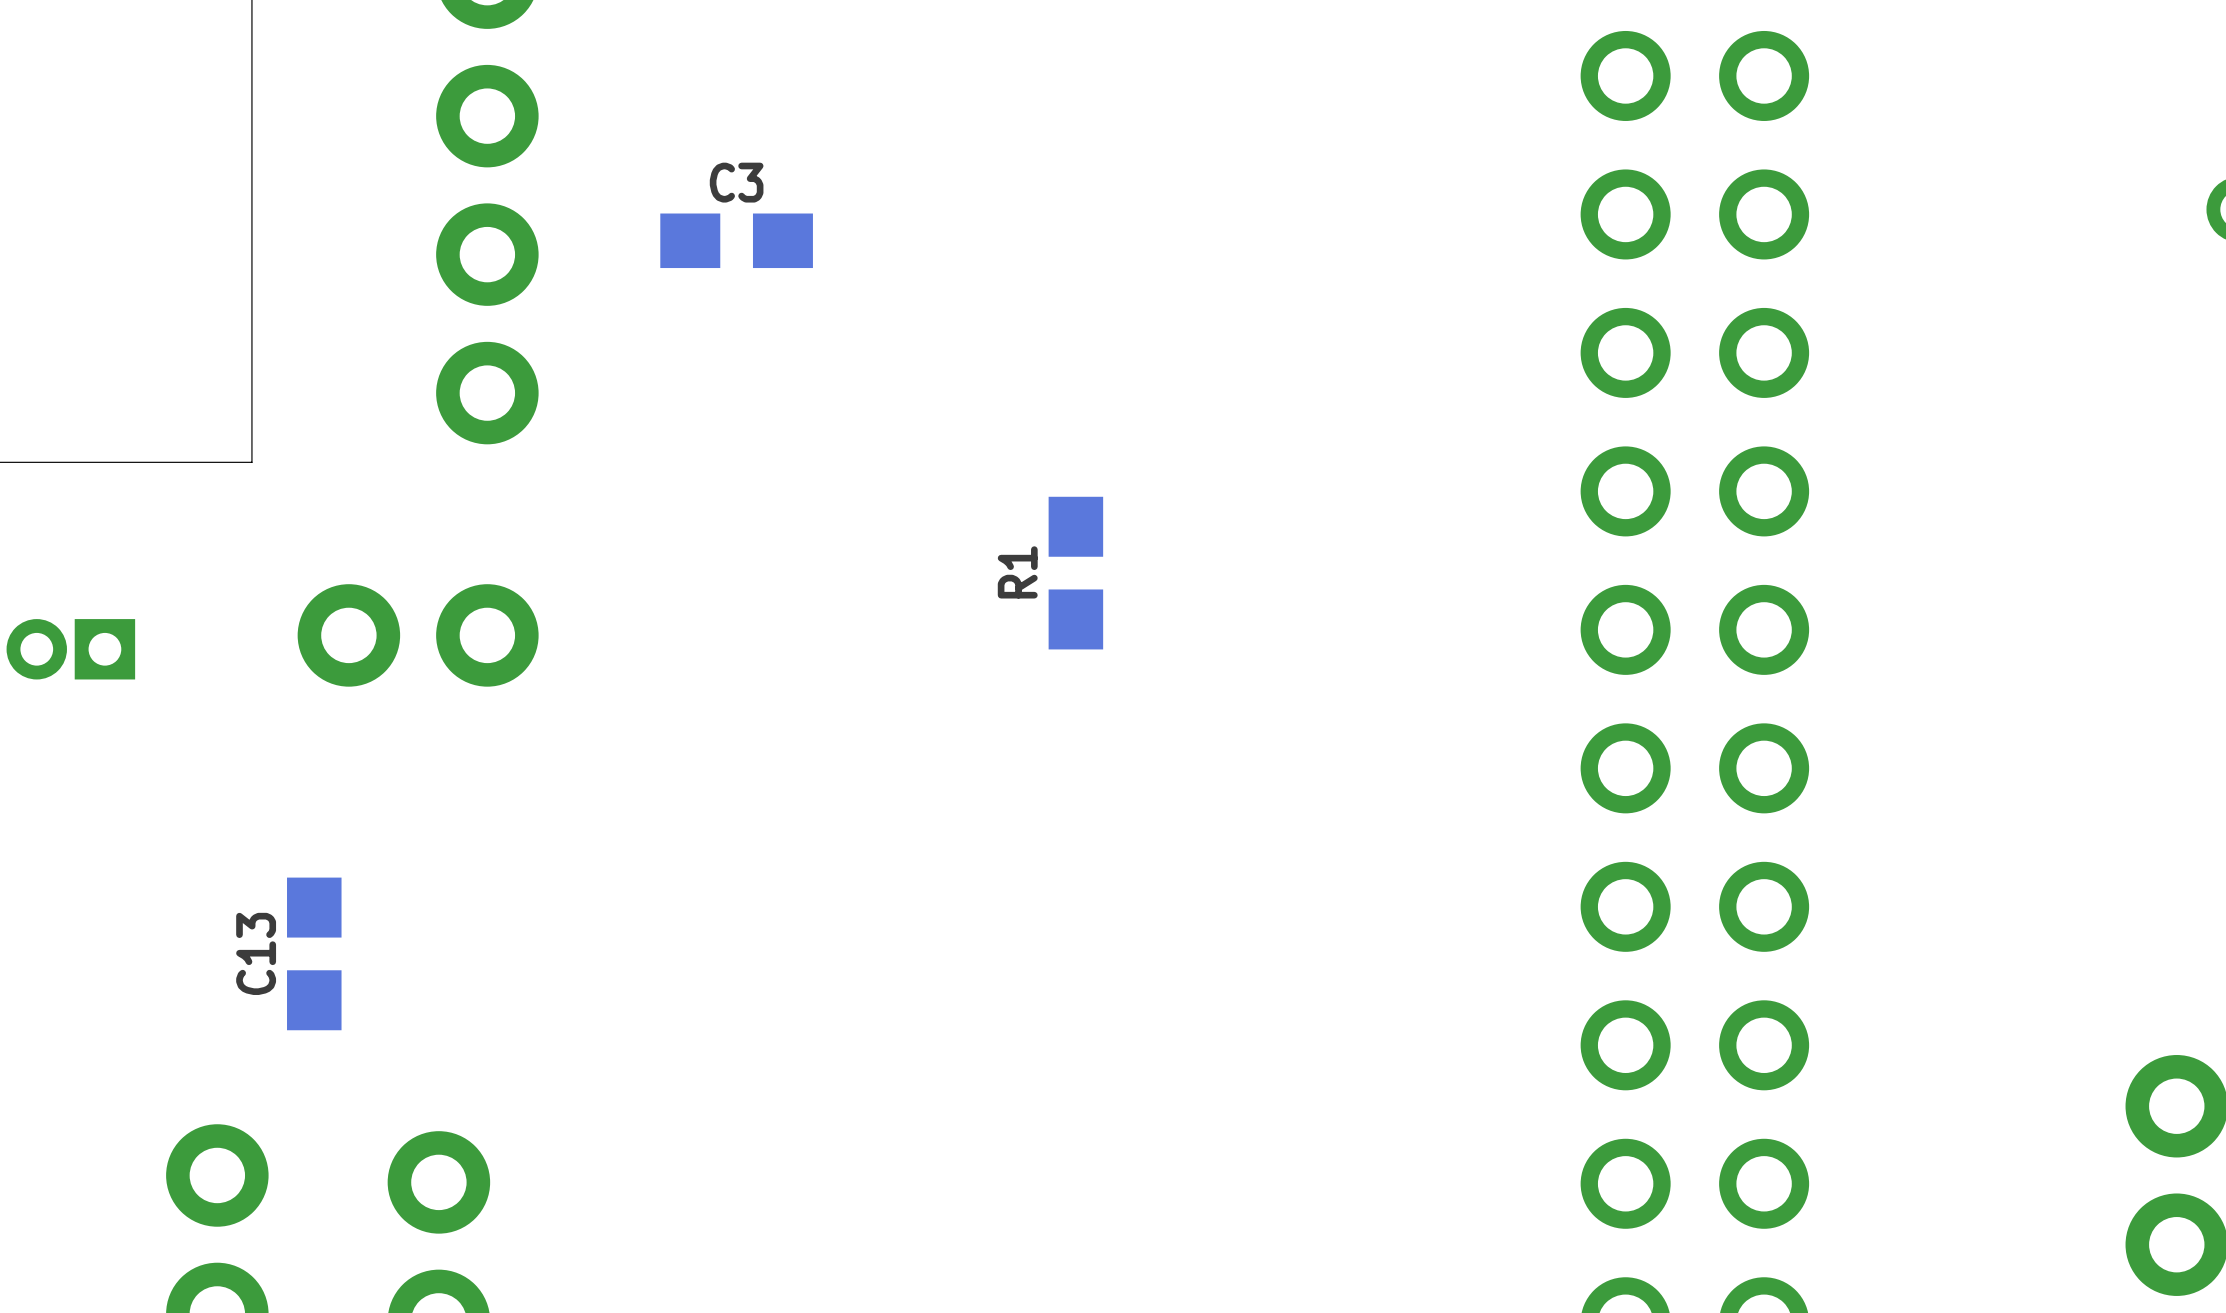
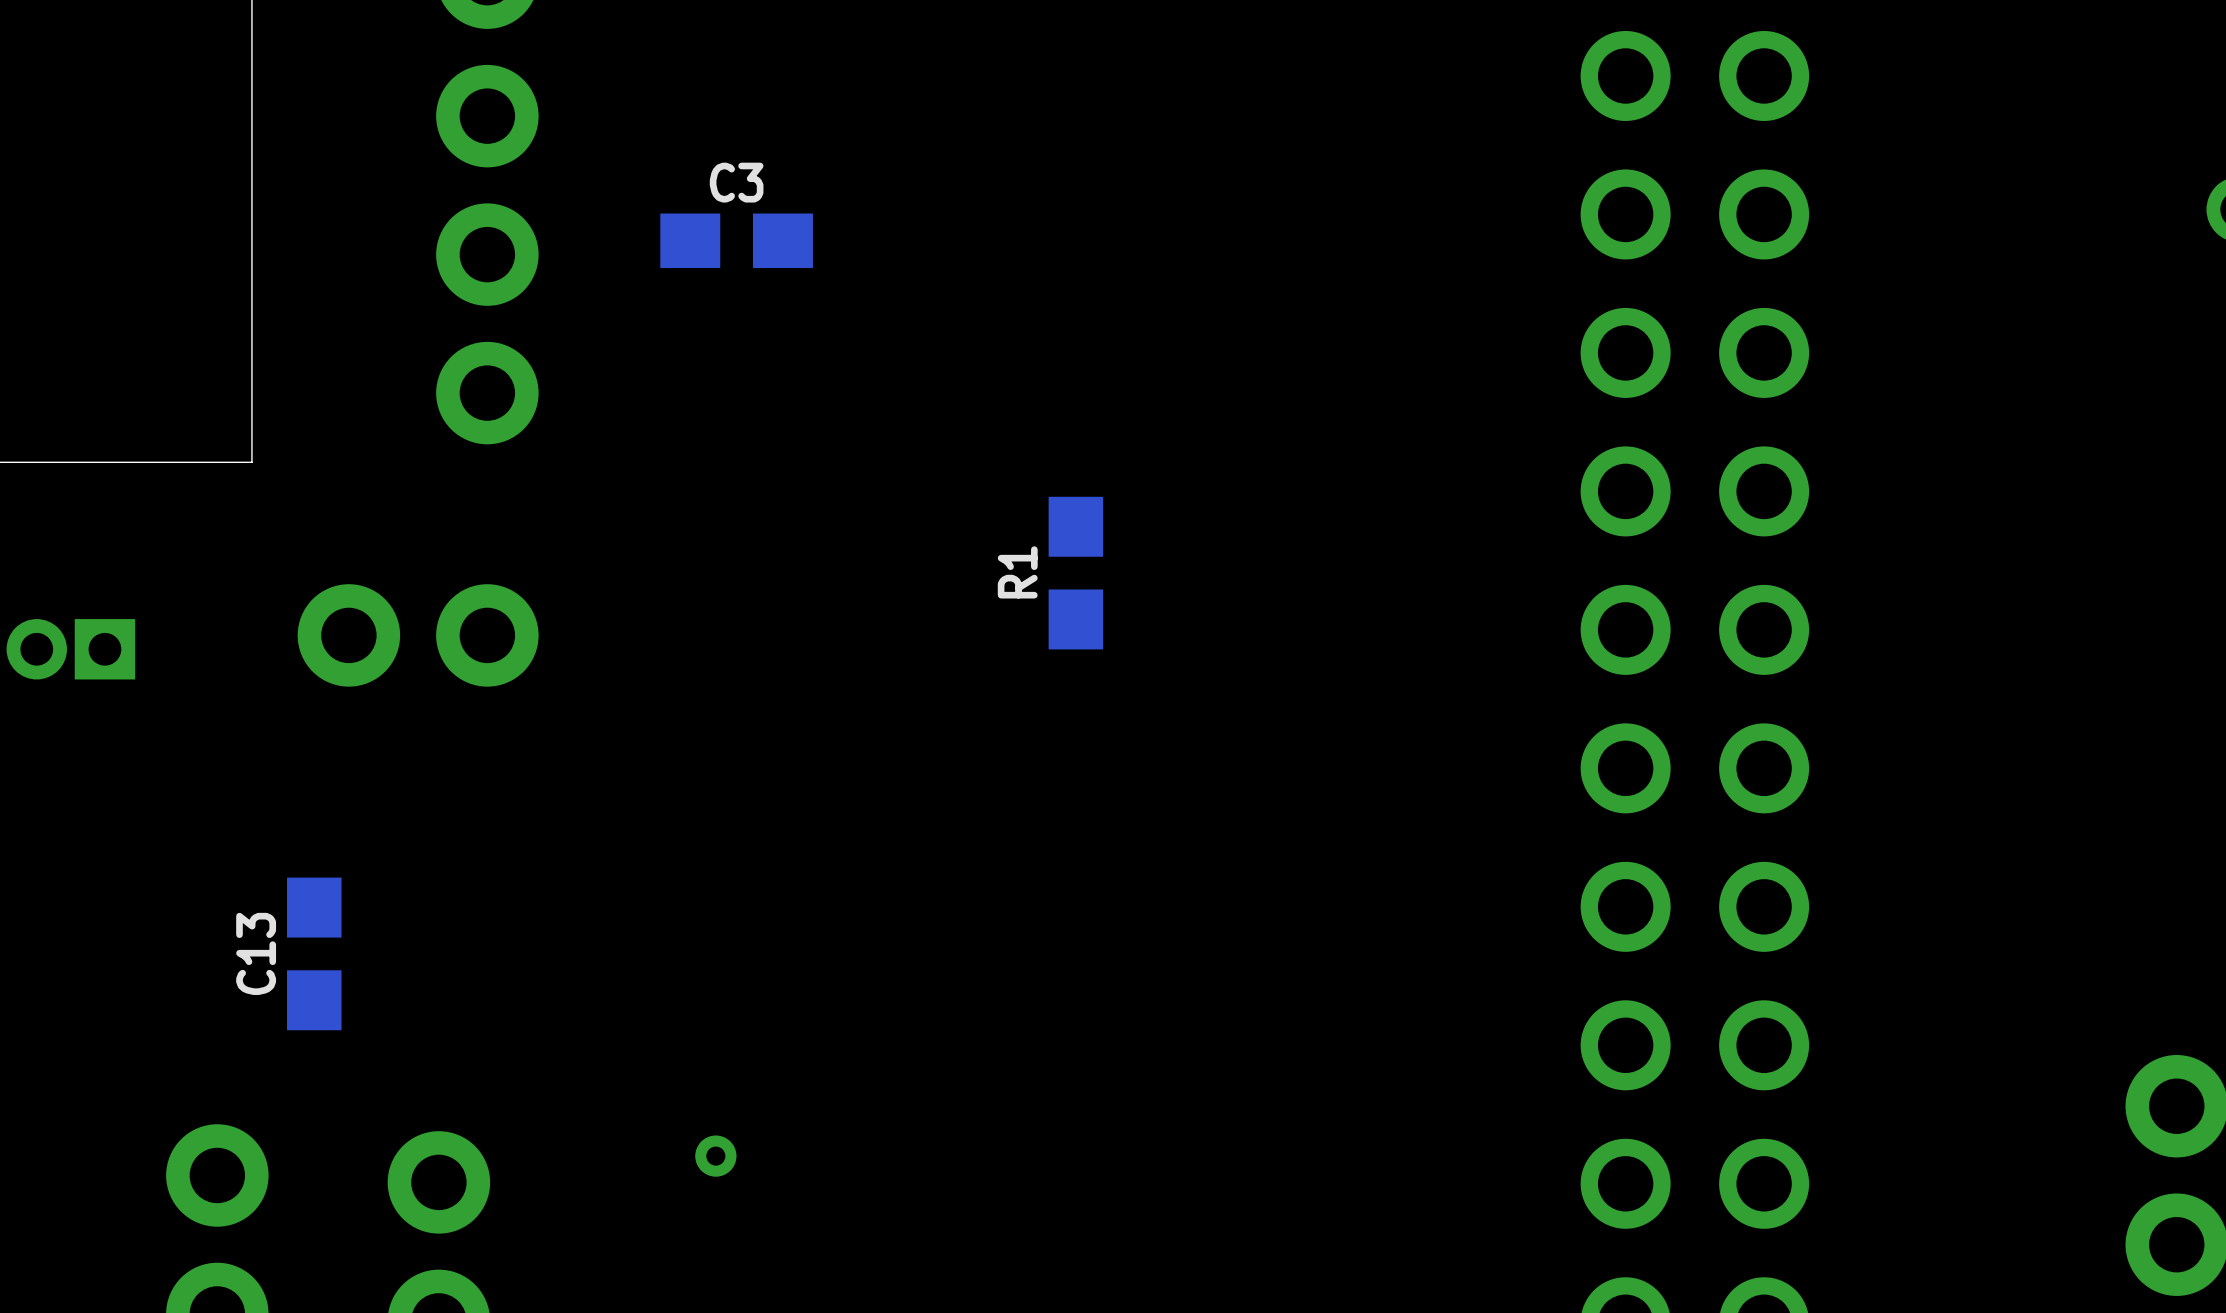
via: none -> (715, 1156)

